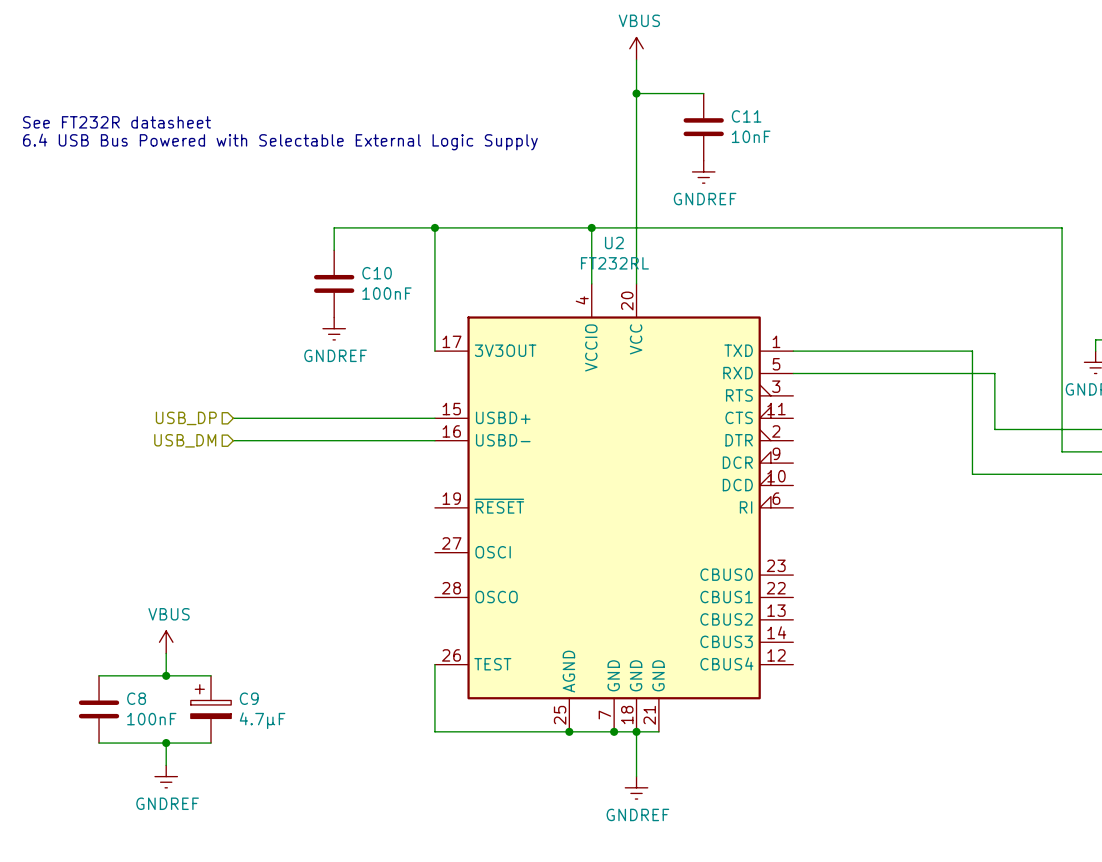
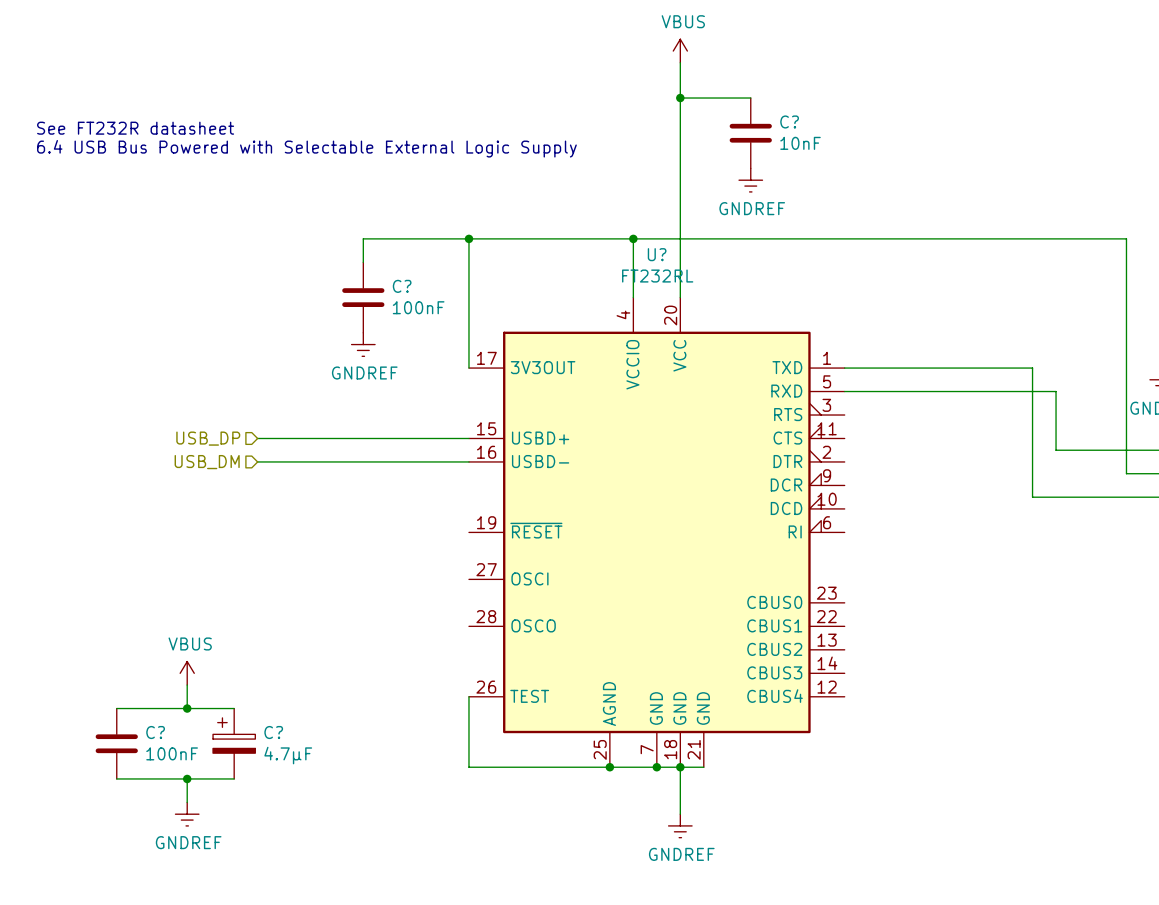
C11 name: C11 (746, 116) -> C? (789, 121)
U2 name: U2 (614, 242) -> U? (657, 254)
C10 name: C10 (377, 273) -> C? (402, 286)
C8 name: C8 (136, 698) -> C? (155, 732)
C9 name: C9 (249, 698) -> C? (273, 732)

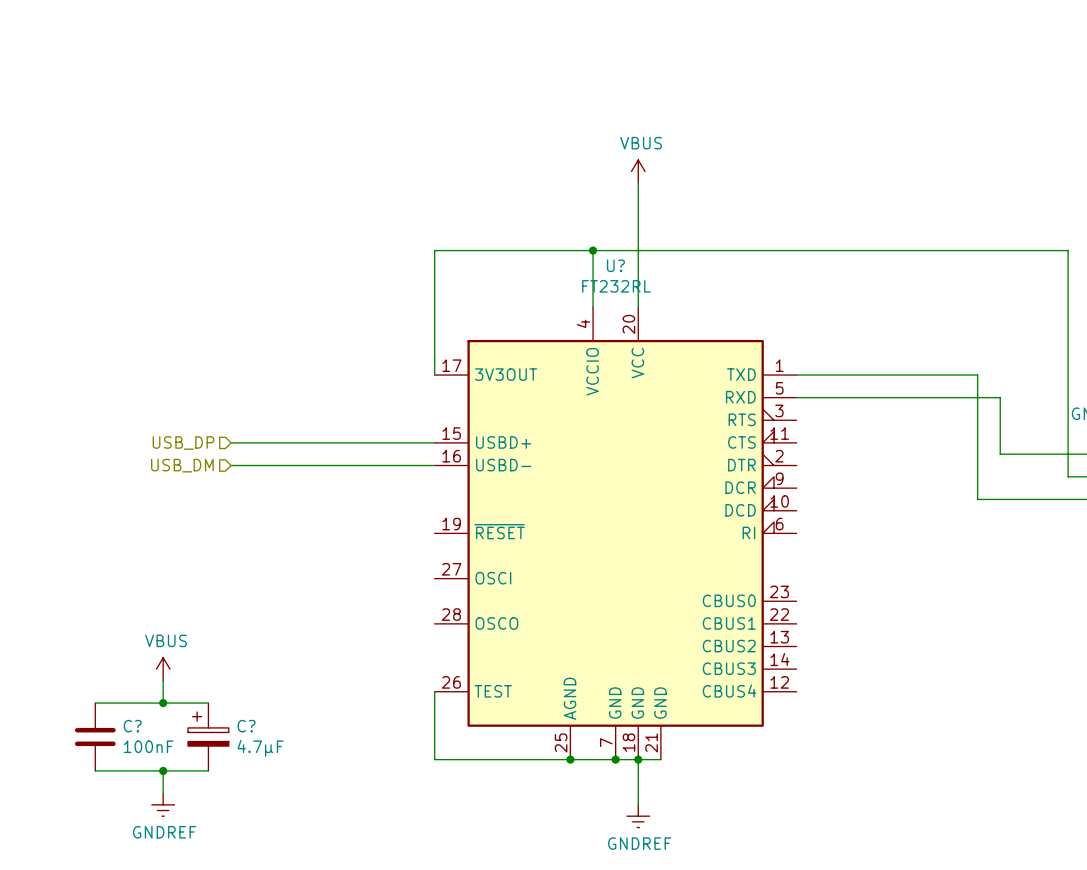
power symbol position: VBUS (680, 51) -> VBUS (638, 171)
wire: (680, 62) (680, 168) -> none
wire: (680, 98) (750, 98) -> none
junction: (680, 98) -> none
text: See FT232R datasheet (135, 128) -> none
C?: 10nF (750, 133) -> none
text: 6.4 USB Bus Powered with Selectable External Logic Supply (306, 148) -> none
power symbol: GNDREF (750, 180) -> none
wire: (468, 238) (363, 238) (363, 262) -> none
junction: (468, 238) -> none
C?: 100nF (363, 297) -> none
power symbol: GNDREF (363, 344) -> none

